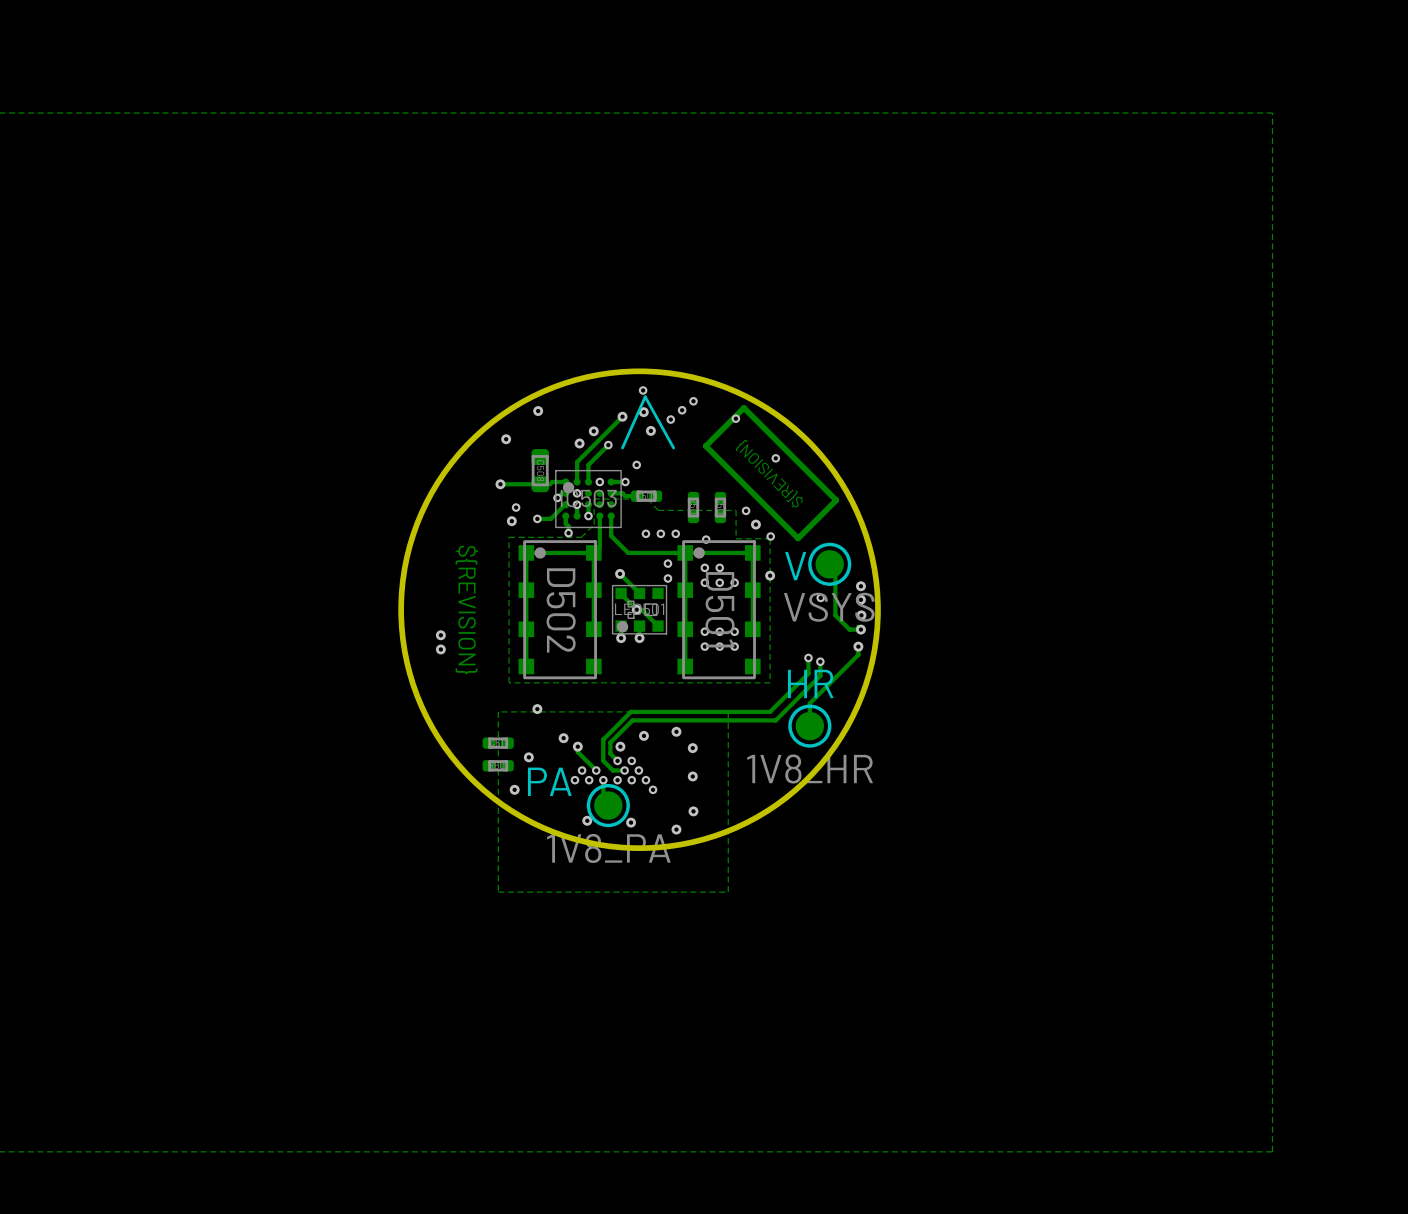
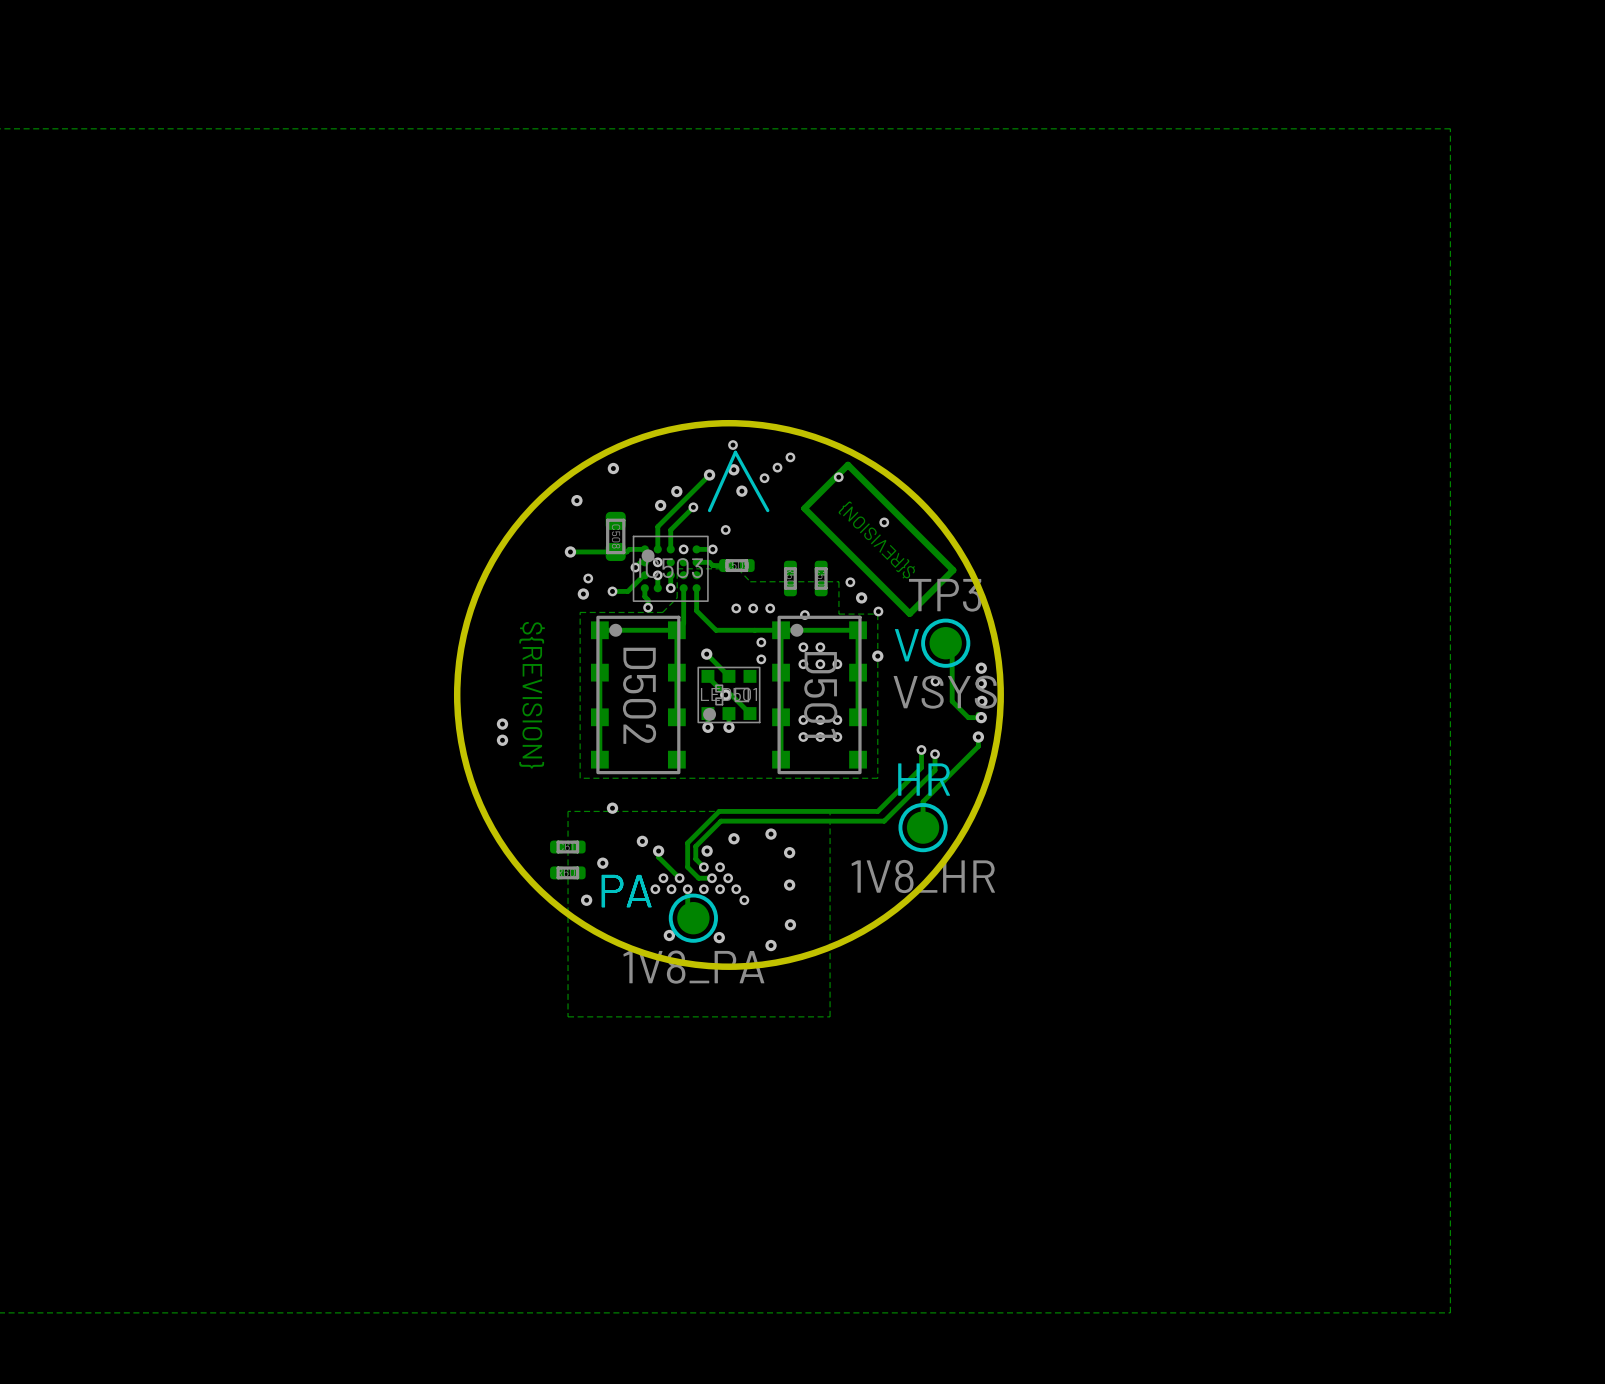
V name: V (795, 566) -> TP3 (945, 595)
text: none -> PA (626, 891)

